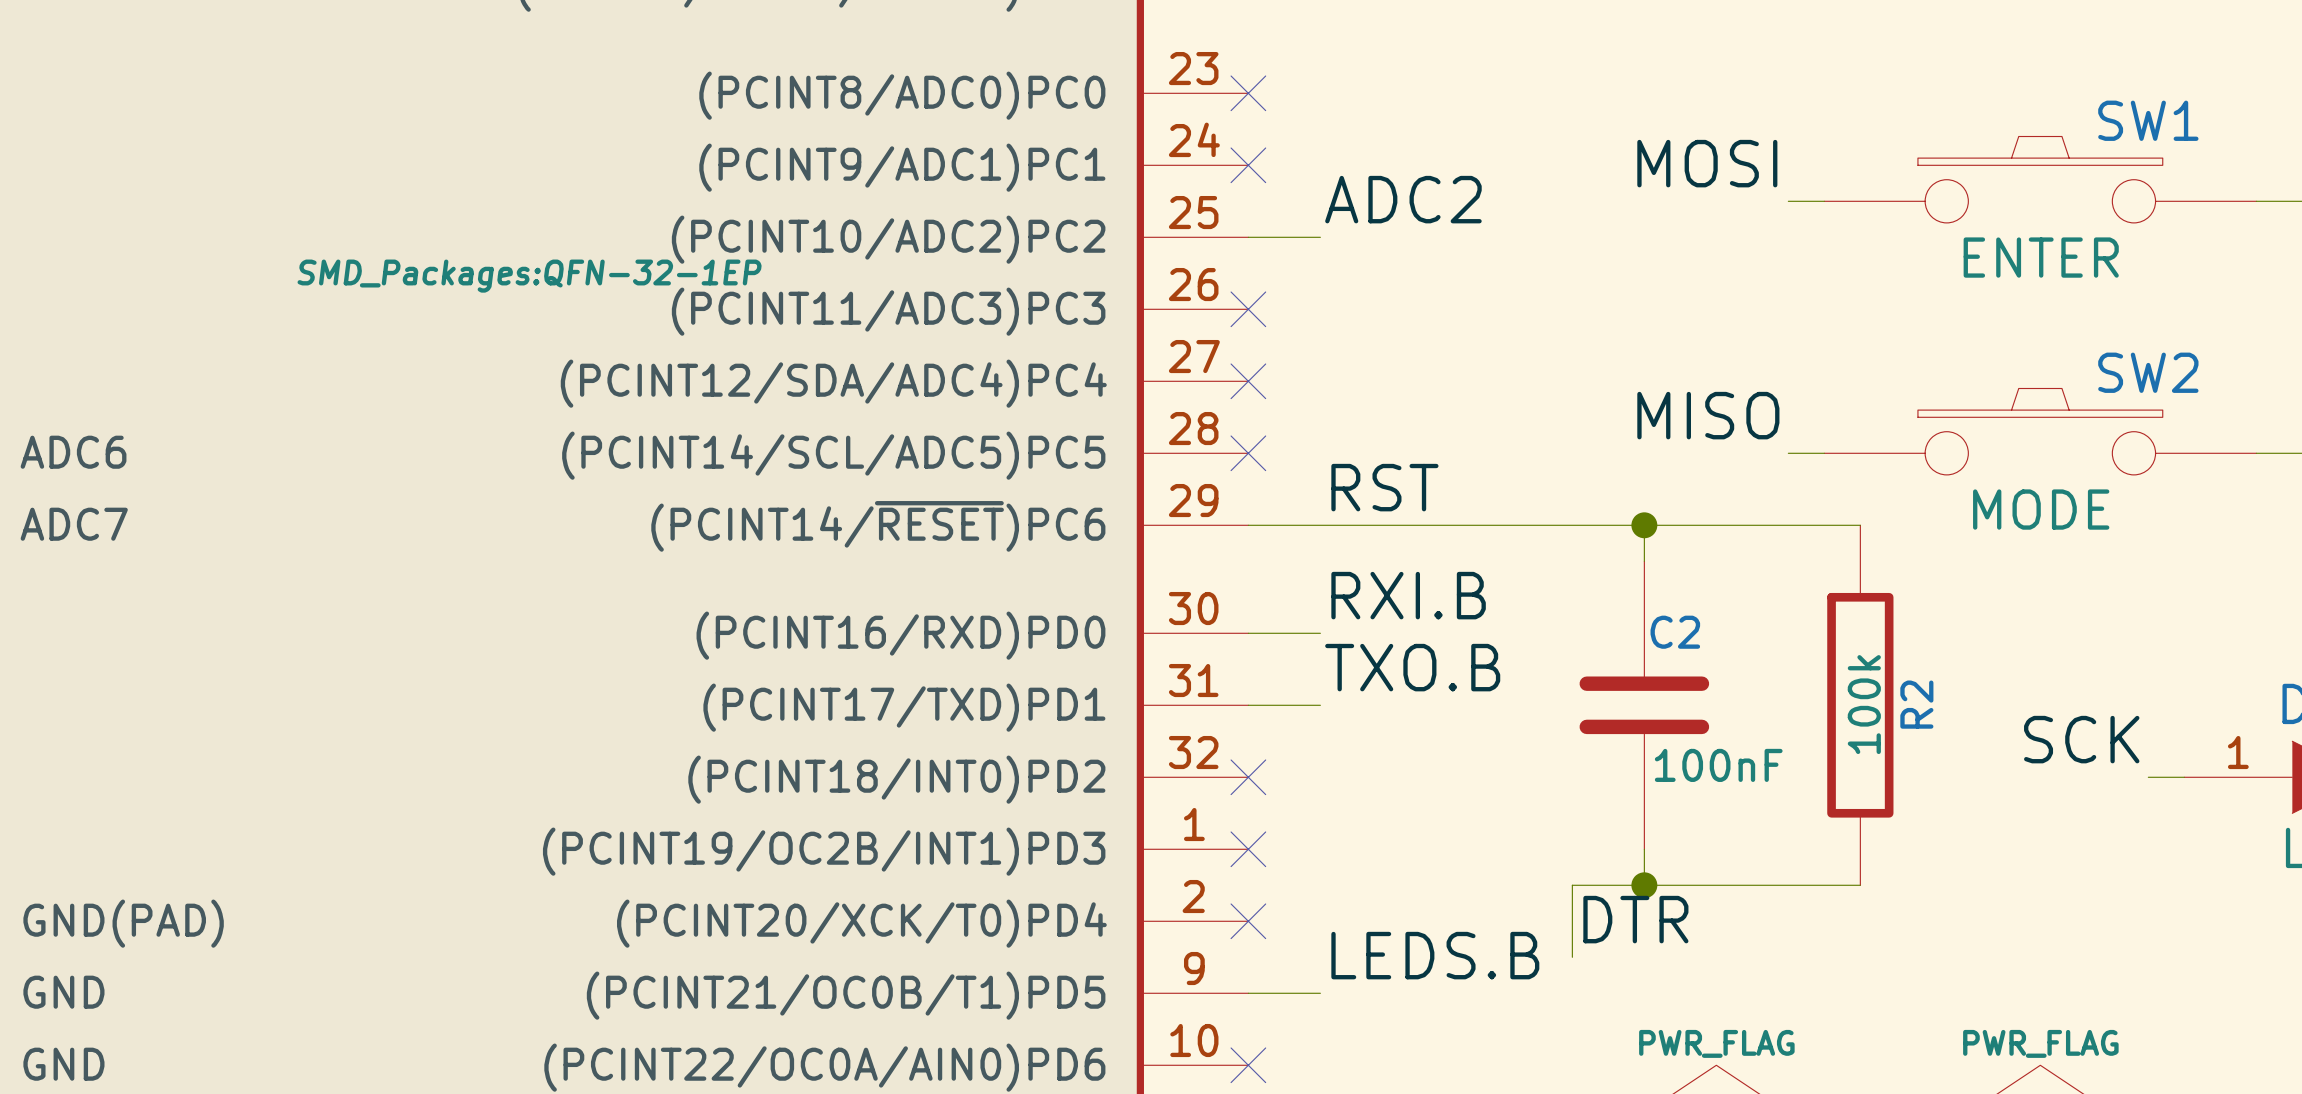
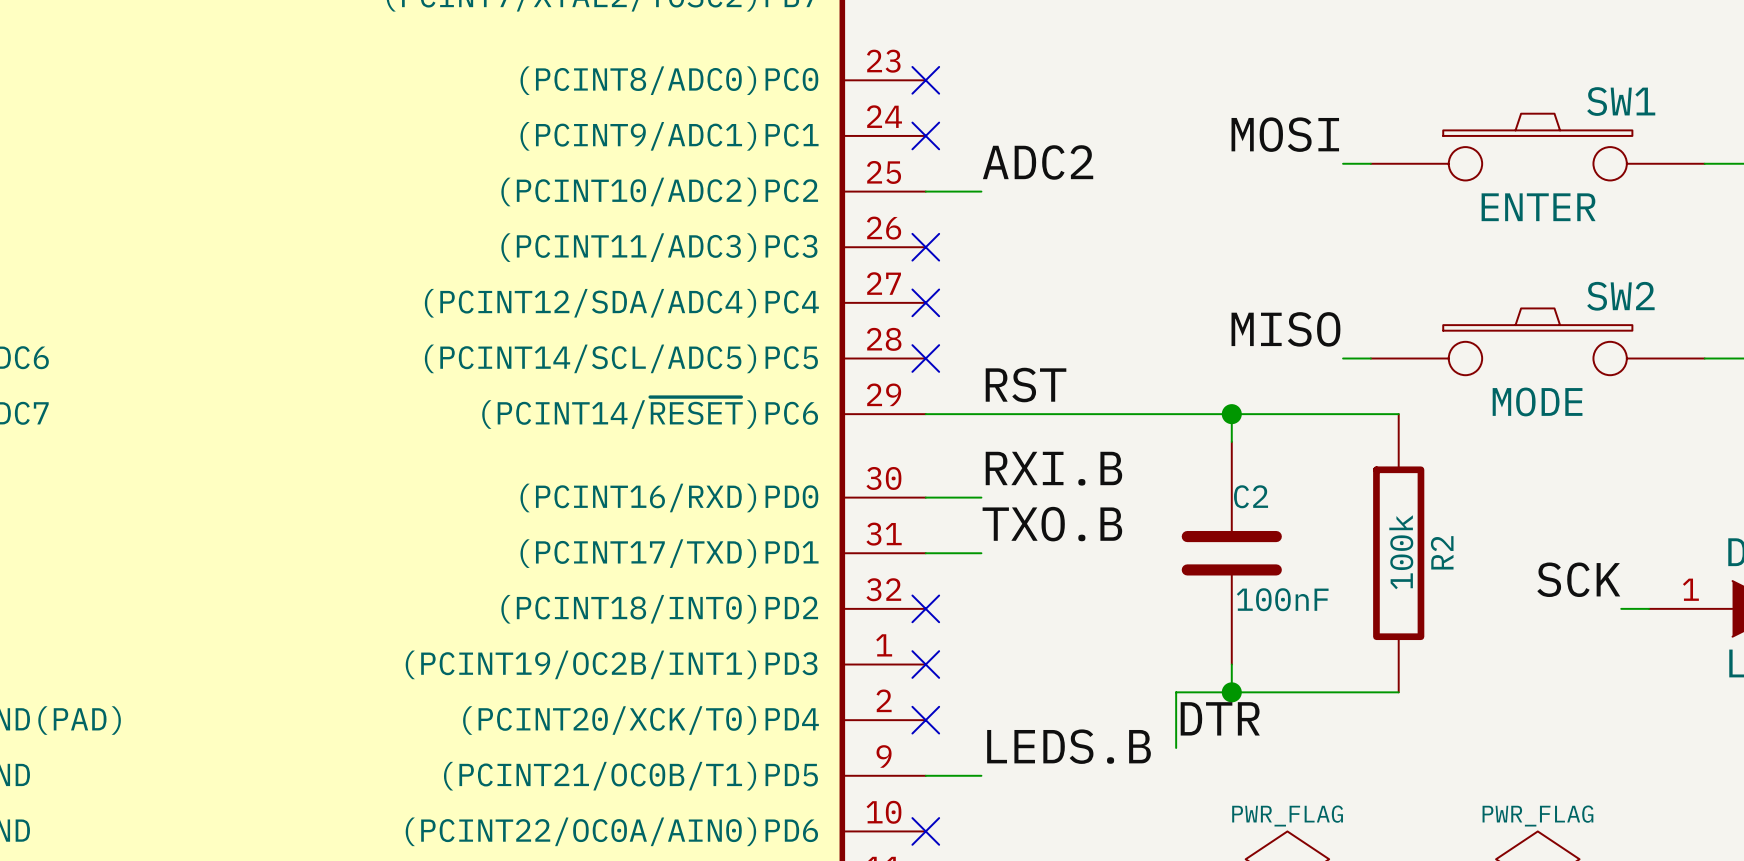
part text: SMD_Packages:QFN-32-1EP (529, 276) -> none

